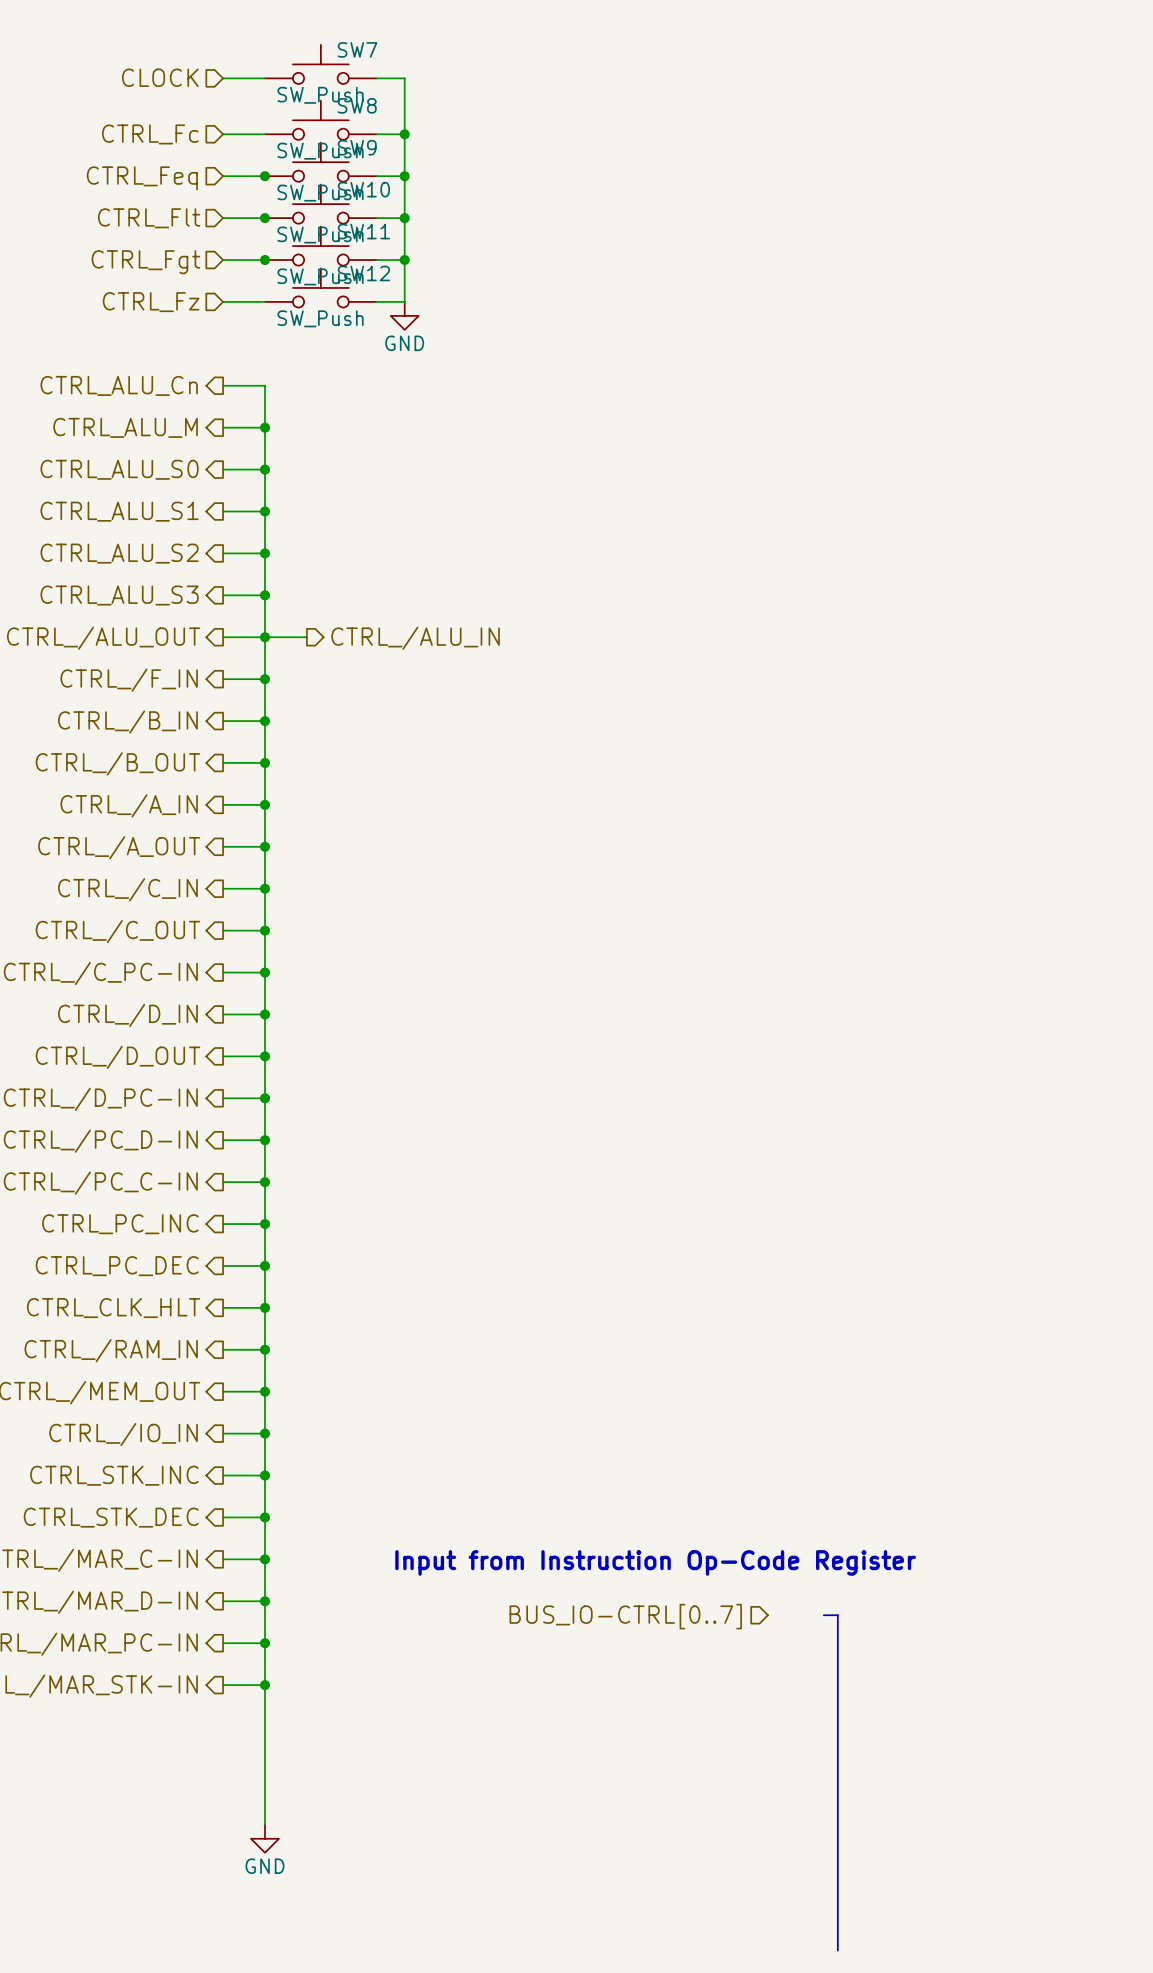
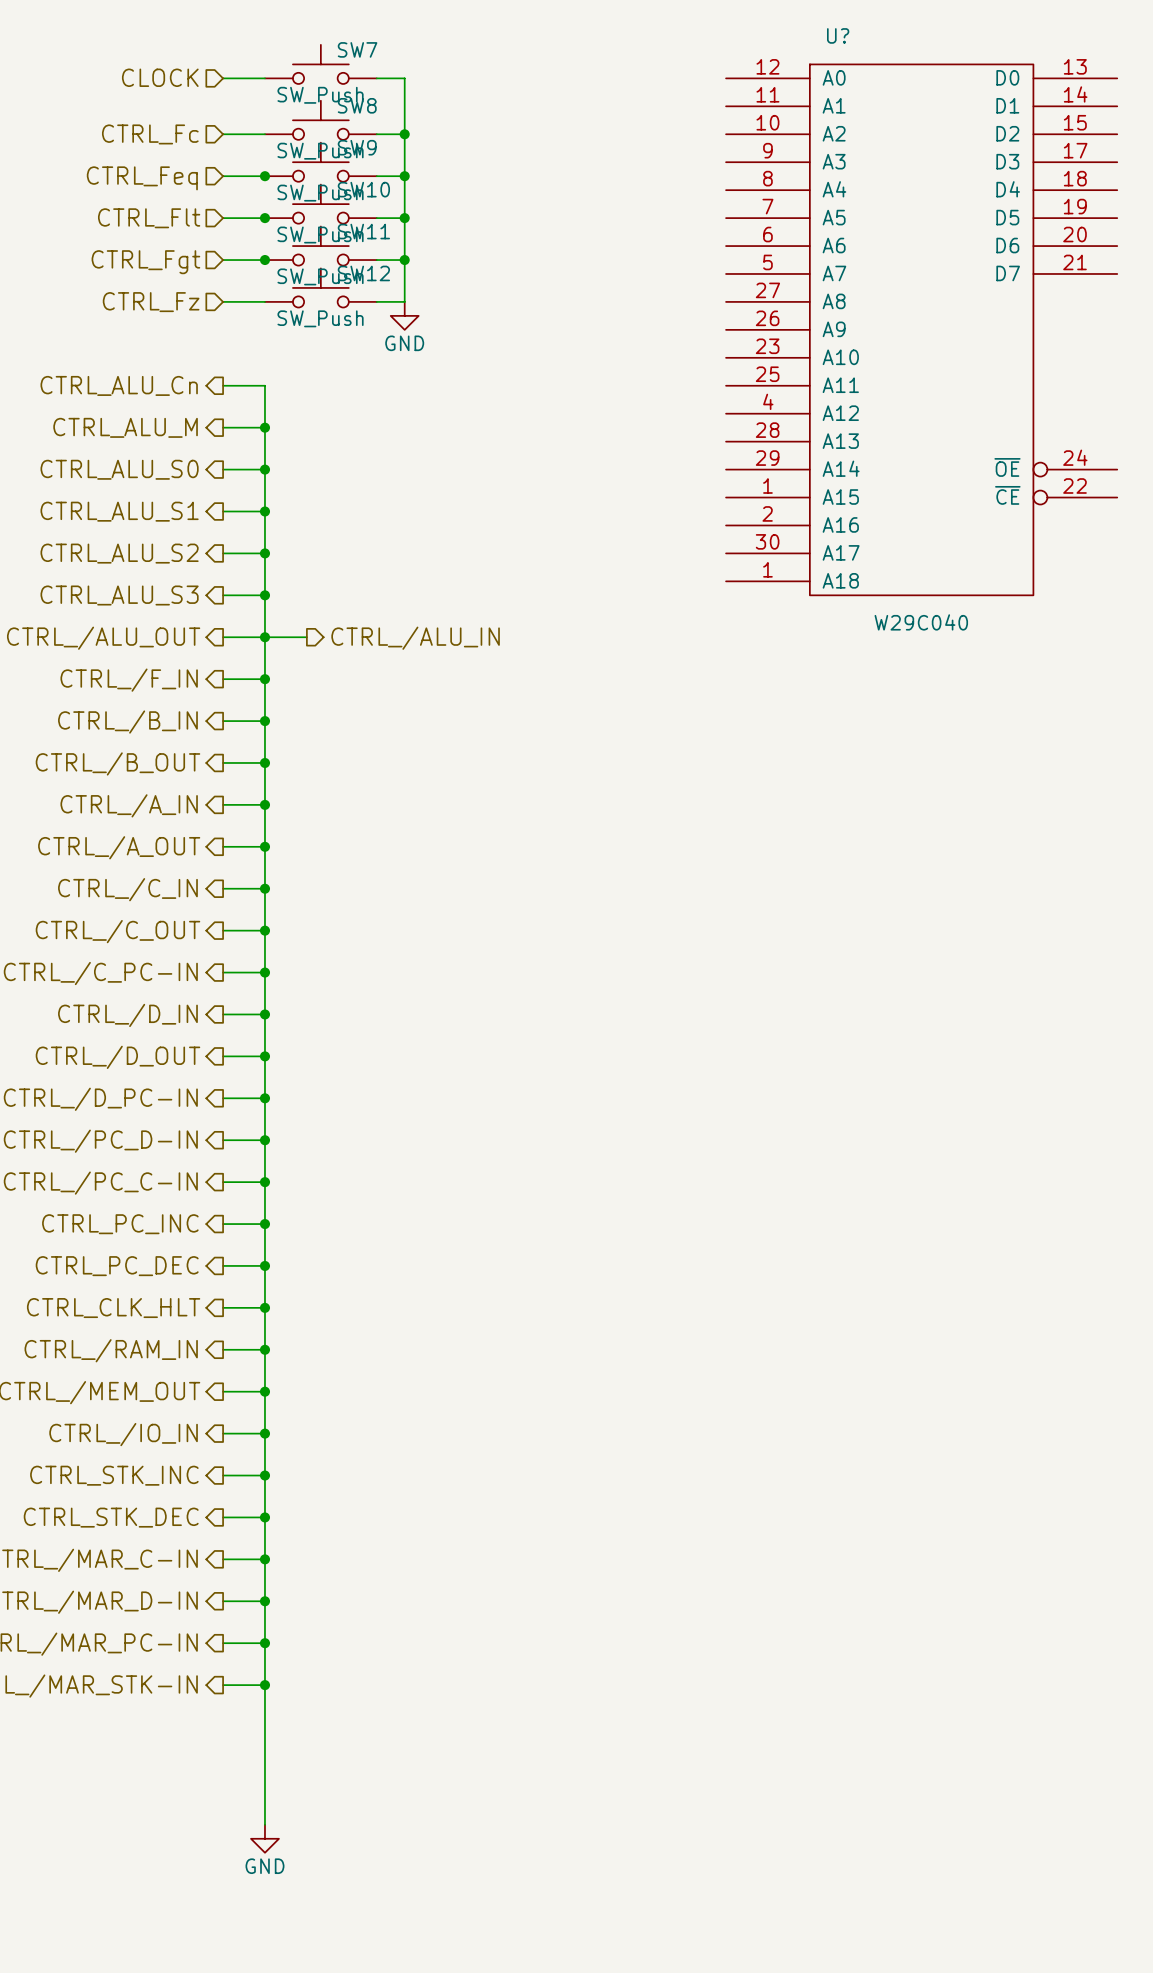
U?: none -> W29C040 (921, 329)
text: Input from Instruction Op-Code Register (655, 1562) -> none
bus: (823, 1615) (837, 1615) (837, 1950) -> none
hierarchical label: BUS_IO-CTRL[0..7] (625, 1616) -> none

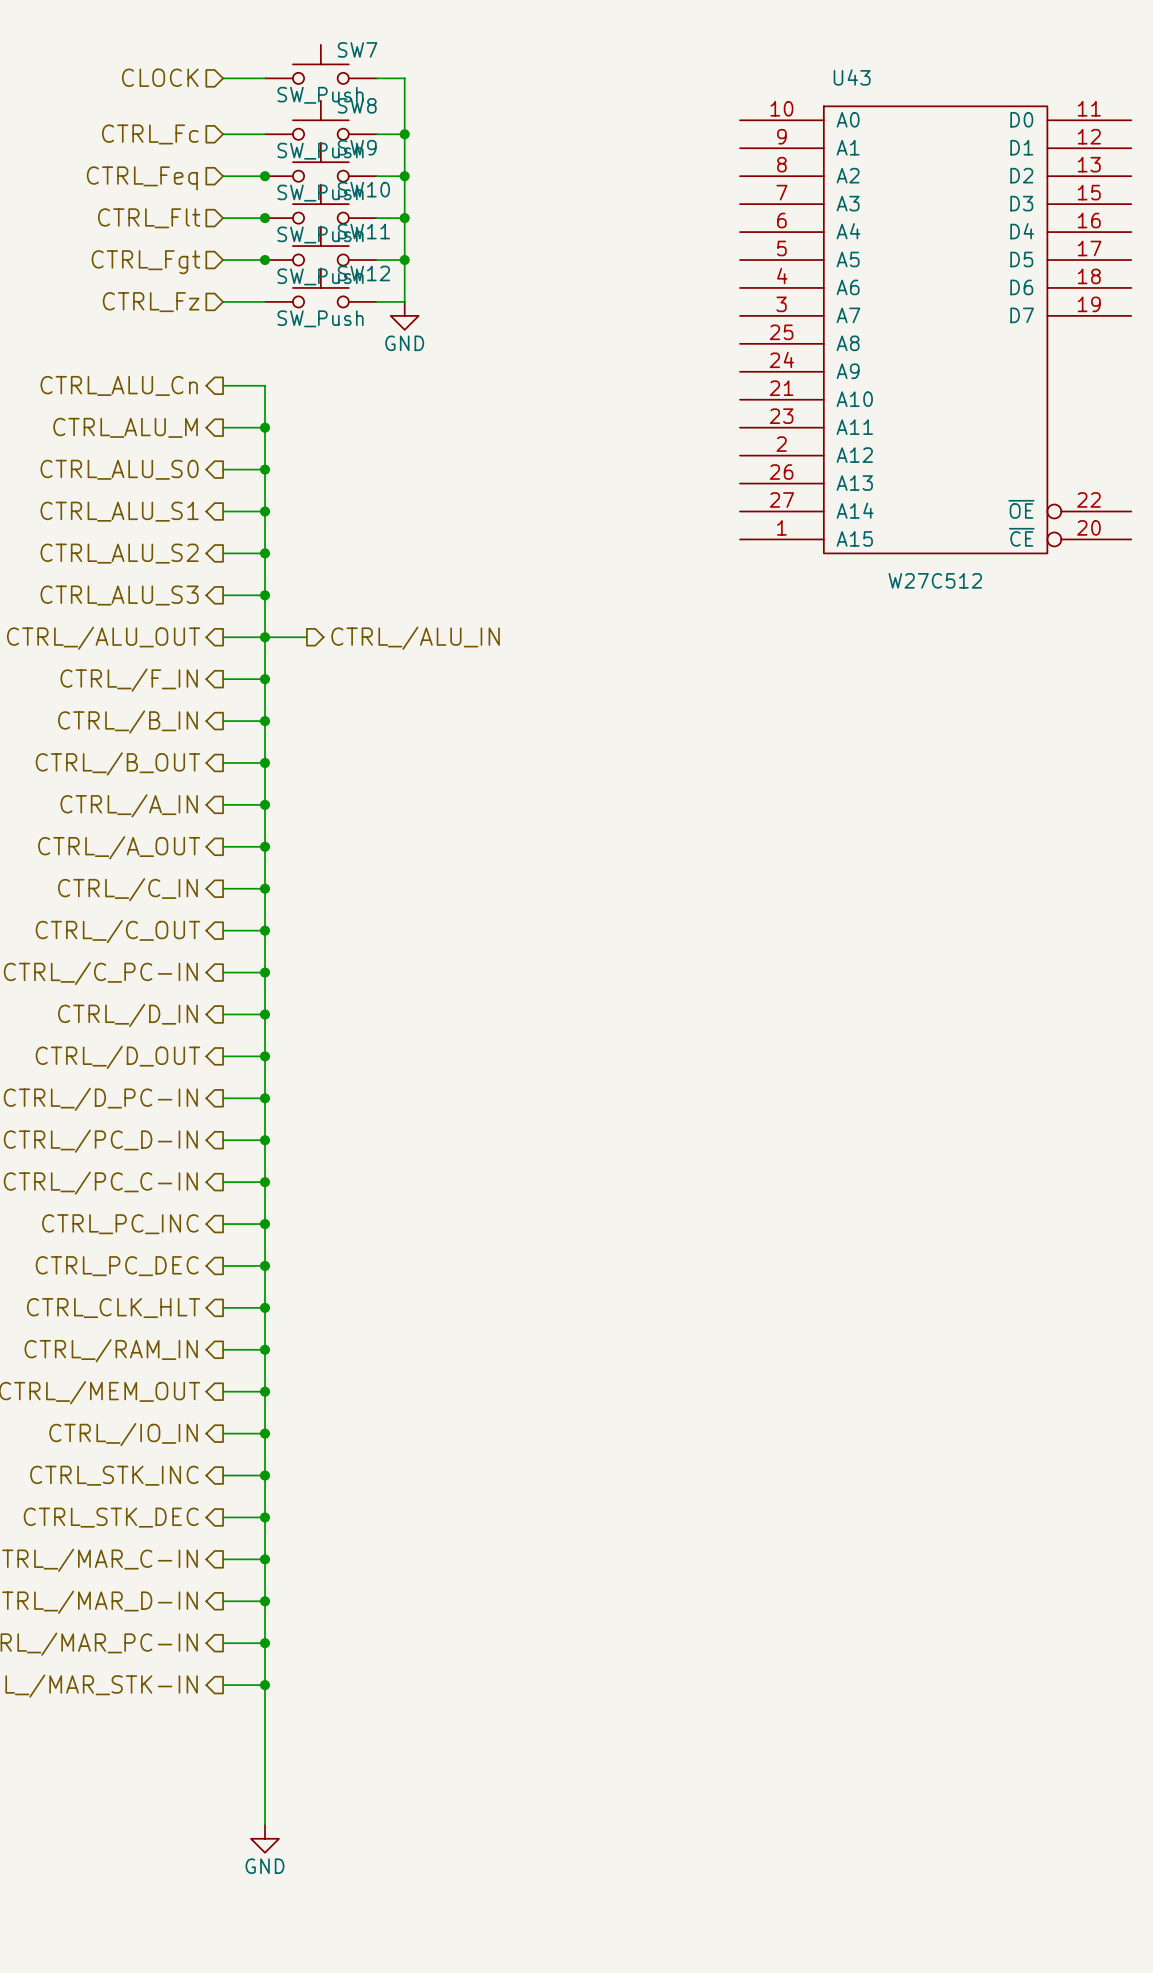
U?: W29C040 (921, 329) -> none
U43: none -> W27C512 (935, 329)

